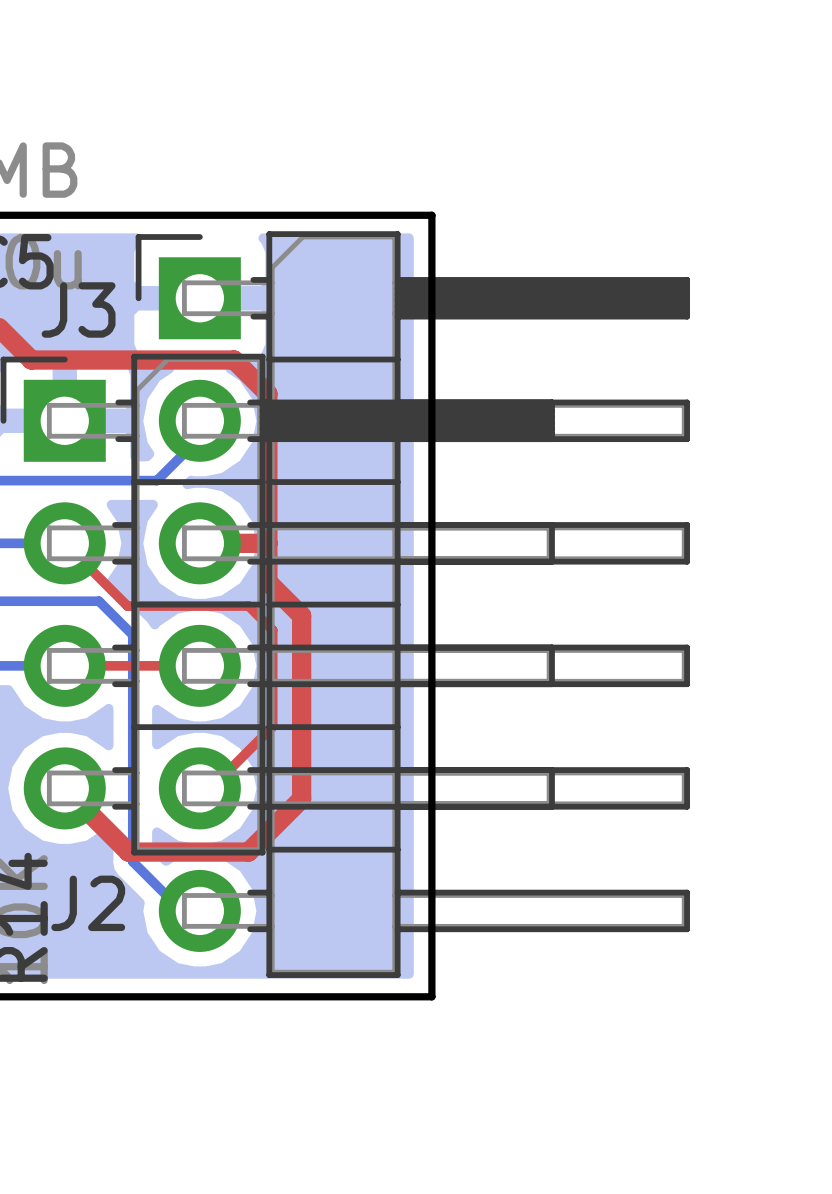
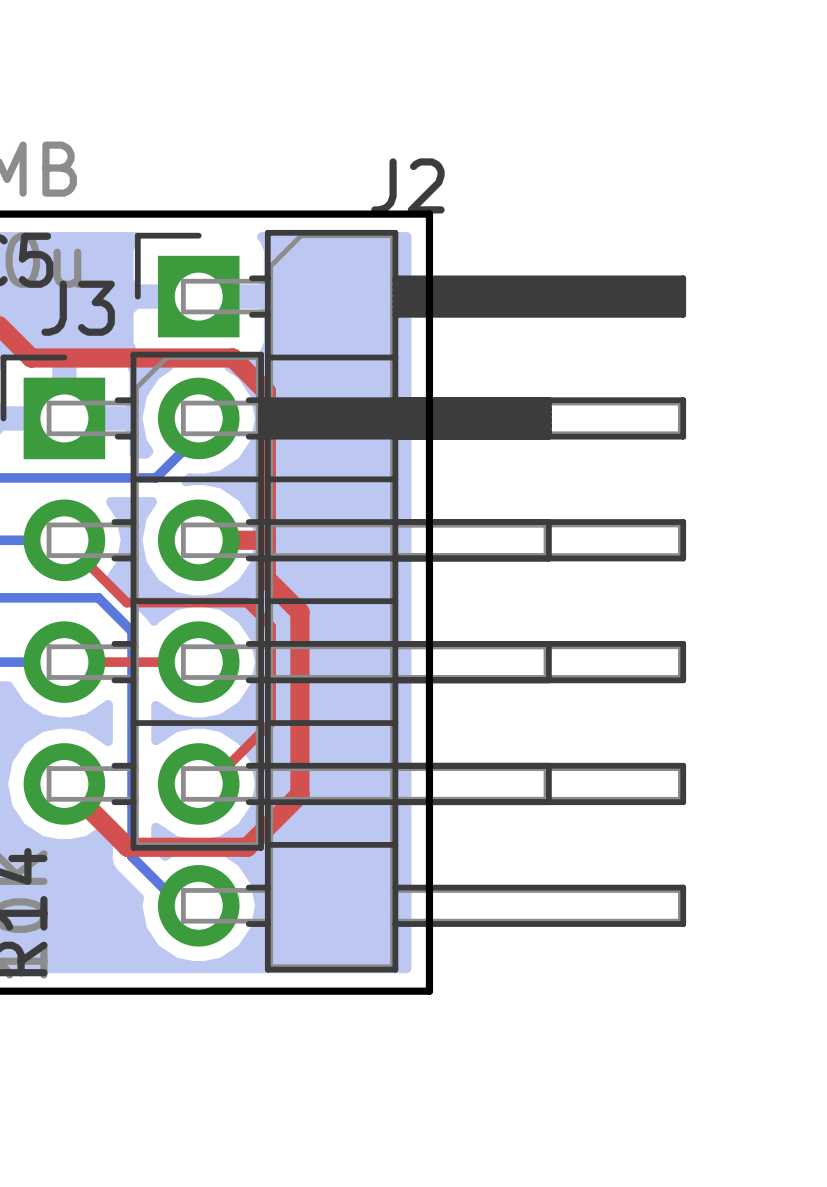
J2 name position: J2 (88, 903) -> J2 (407, 185)

